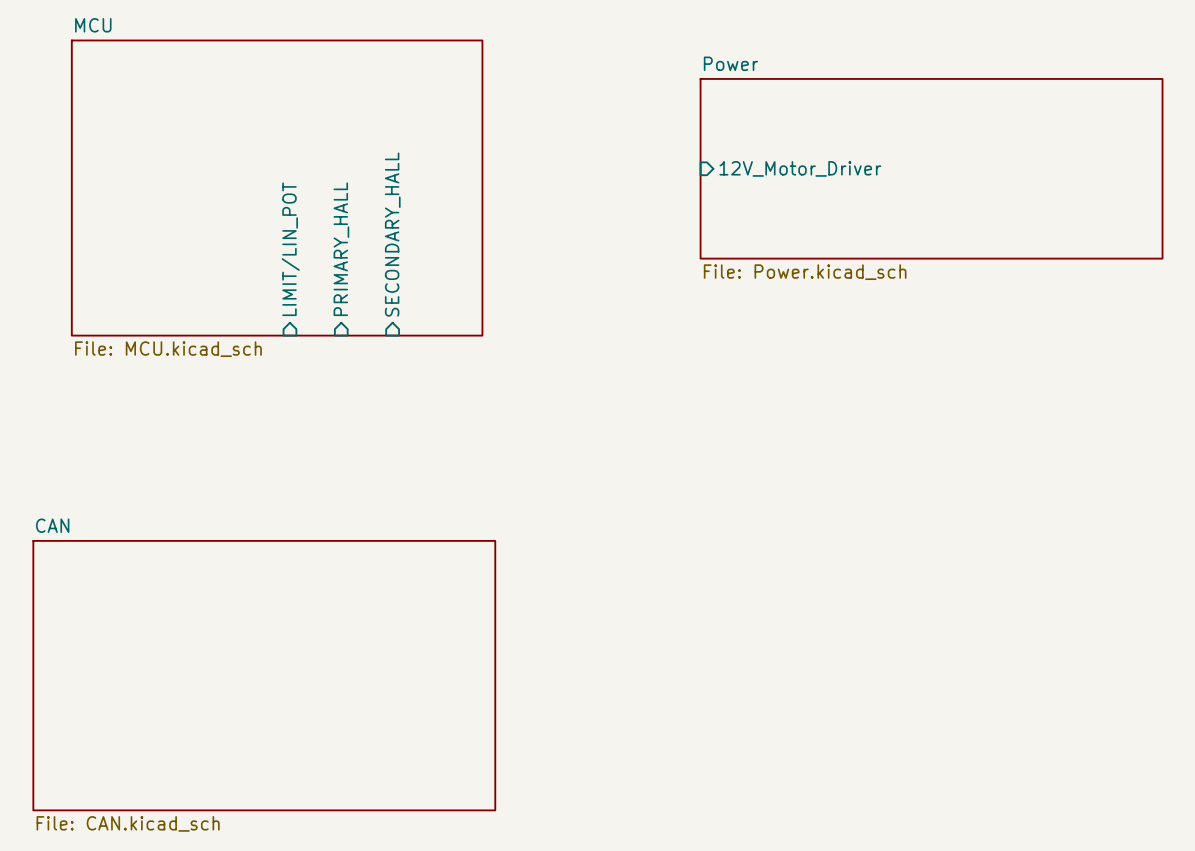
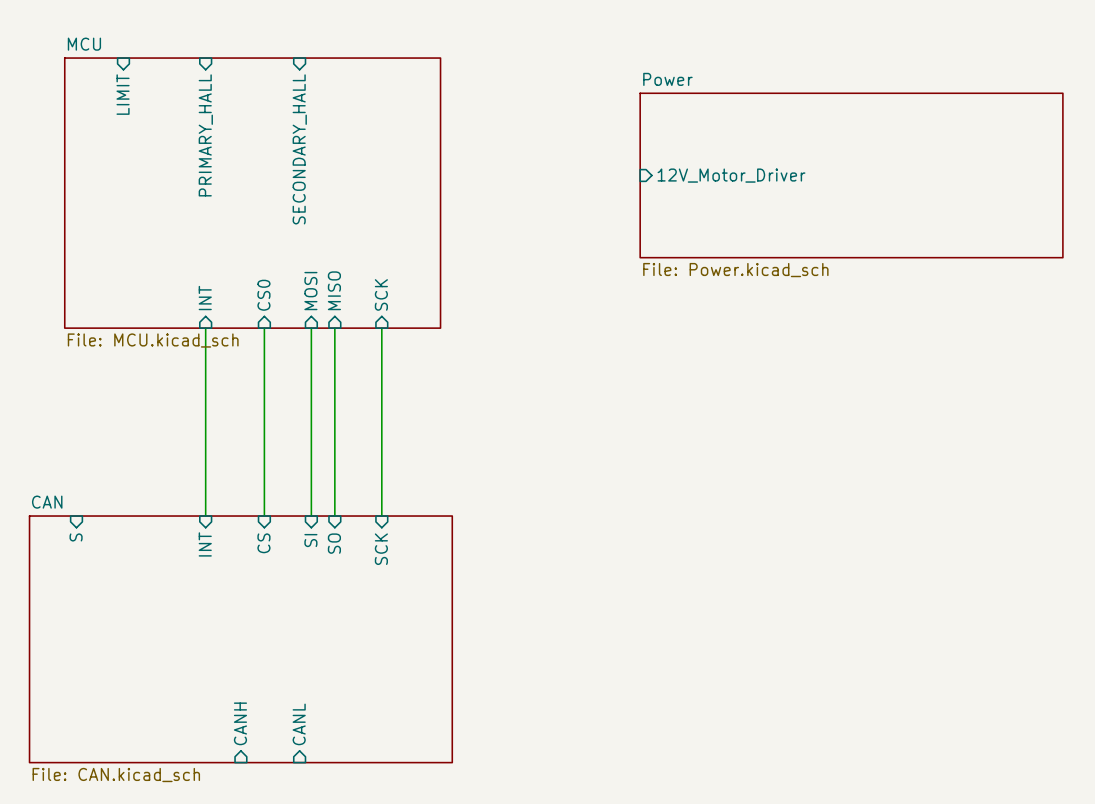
sheet pin: none -> LIMIT (123, 94)
sheet pin: none -> PRIMARY_HALL (205, 135)
sheet pin: none -> SECONDARY_HALL (299, 149)
sheet pin: SECONDARY_HALL (392, 234) -> none
sheet pin: LIMIT/LIN_POT (290, 249) -> CS0 (263, 295)
sheet pin: PRIMARY_HALL (341, 249) -> MOSI (310, 291)
sheet pin: none -> MISO (334, 290)
sheet pin: none -> SCK (381, 294)
sheet pin: none -> INT (205, 298)
wire: none -> (205, 328) (205, 516)
wire: none -> (264, 328) (264, 516)
wire: none -> (311, 328) (311, 516)
wire: none -> (334, 328) (334, 516)
wire: none -> (381, 328) (381, 516)
sheet pin: none -> S (76, 537)
sheet pin: none -> SI (310, 540)
sheet pin: none -> CS (263, 543)
sheet pin: none -> INT (205, 544)
sheet pin: none -> SO (334, 543)
sheet pin: none -> SCK (381, 549)
sheet pin: none -> CANH (240, 723)
sheet pin: none -> CANL (299, 724)

